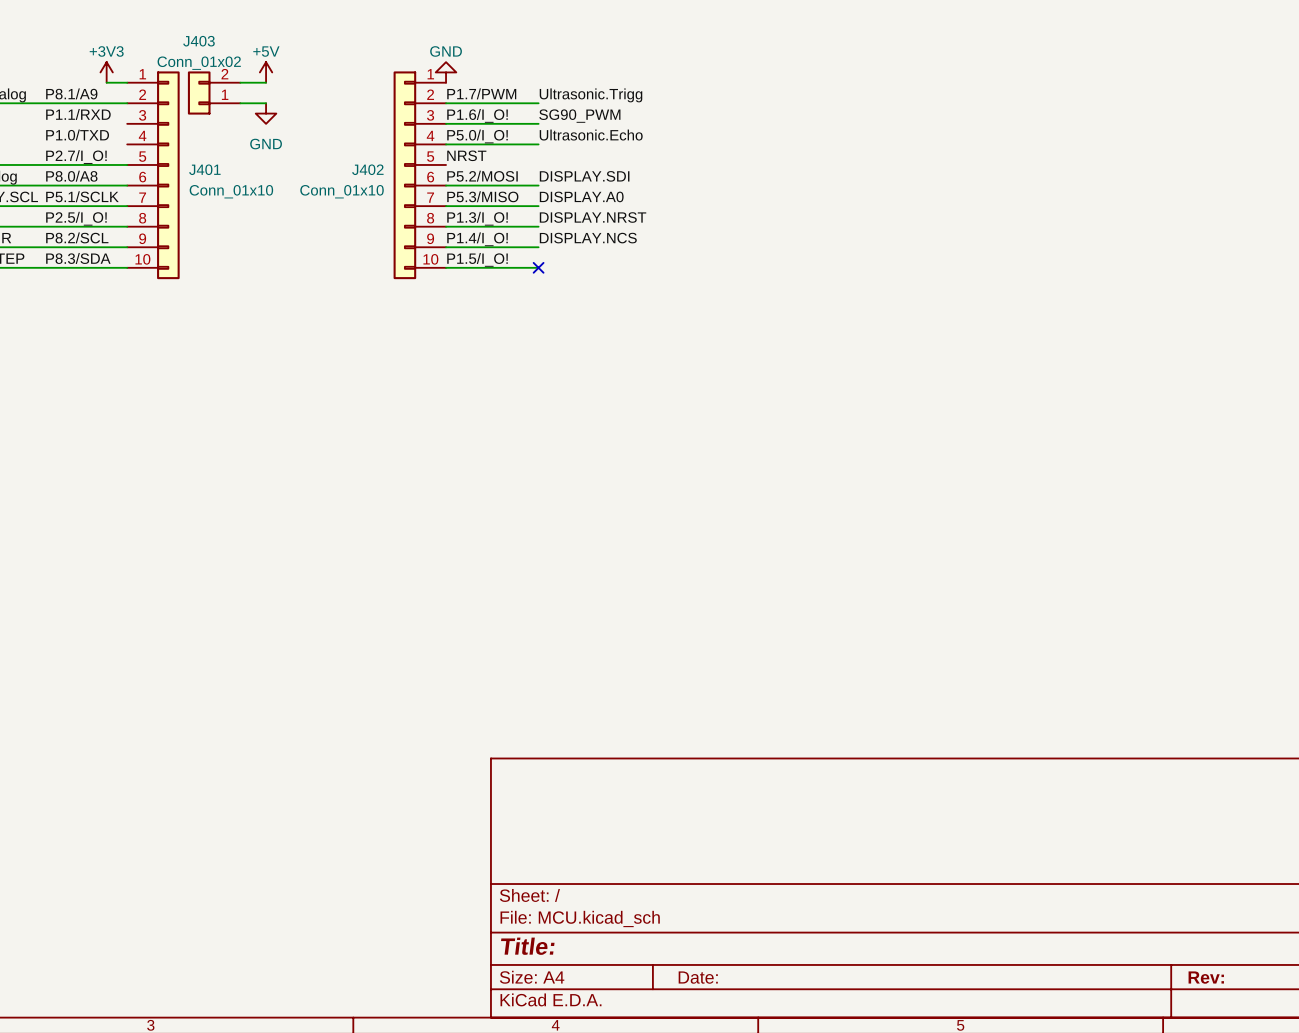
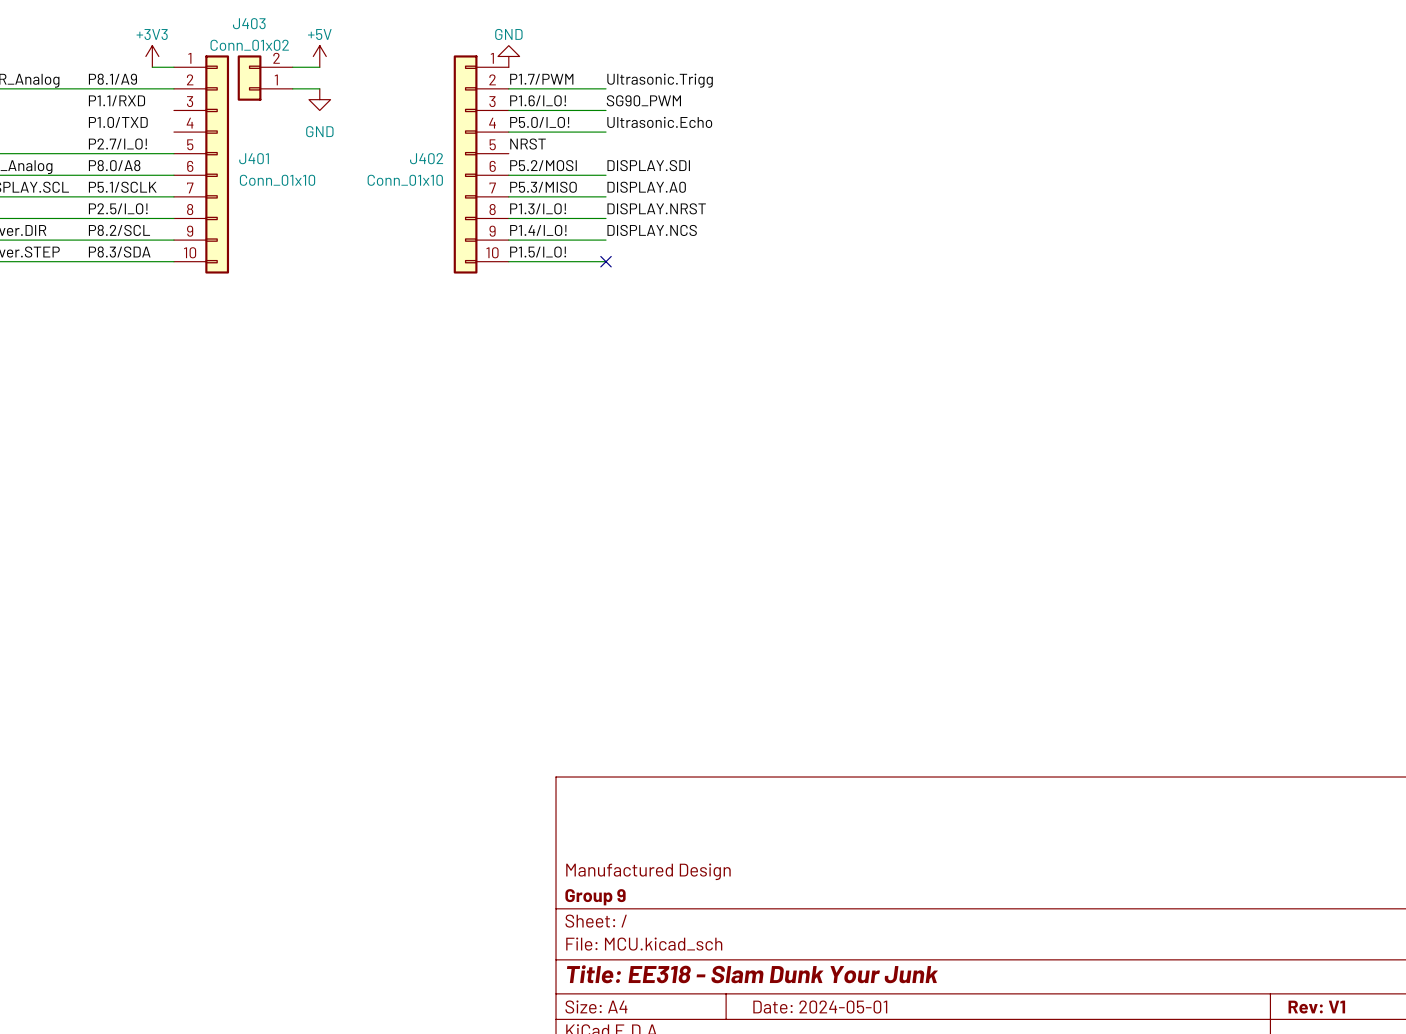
title block: none -> Manufactured Design (648, 871)
title block: none -> Group 9 (595, 897)
title block: Title: (527, 946) -> Title: EE318 - Slam Dunk Your Junk (752, 974)
title block: Date: (698, 977) -> Date: 2024-05-01 (820, 1007)
title block: Rev: (1206, 977) -> Rev: V1 (1316, 1007)

